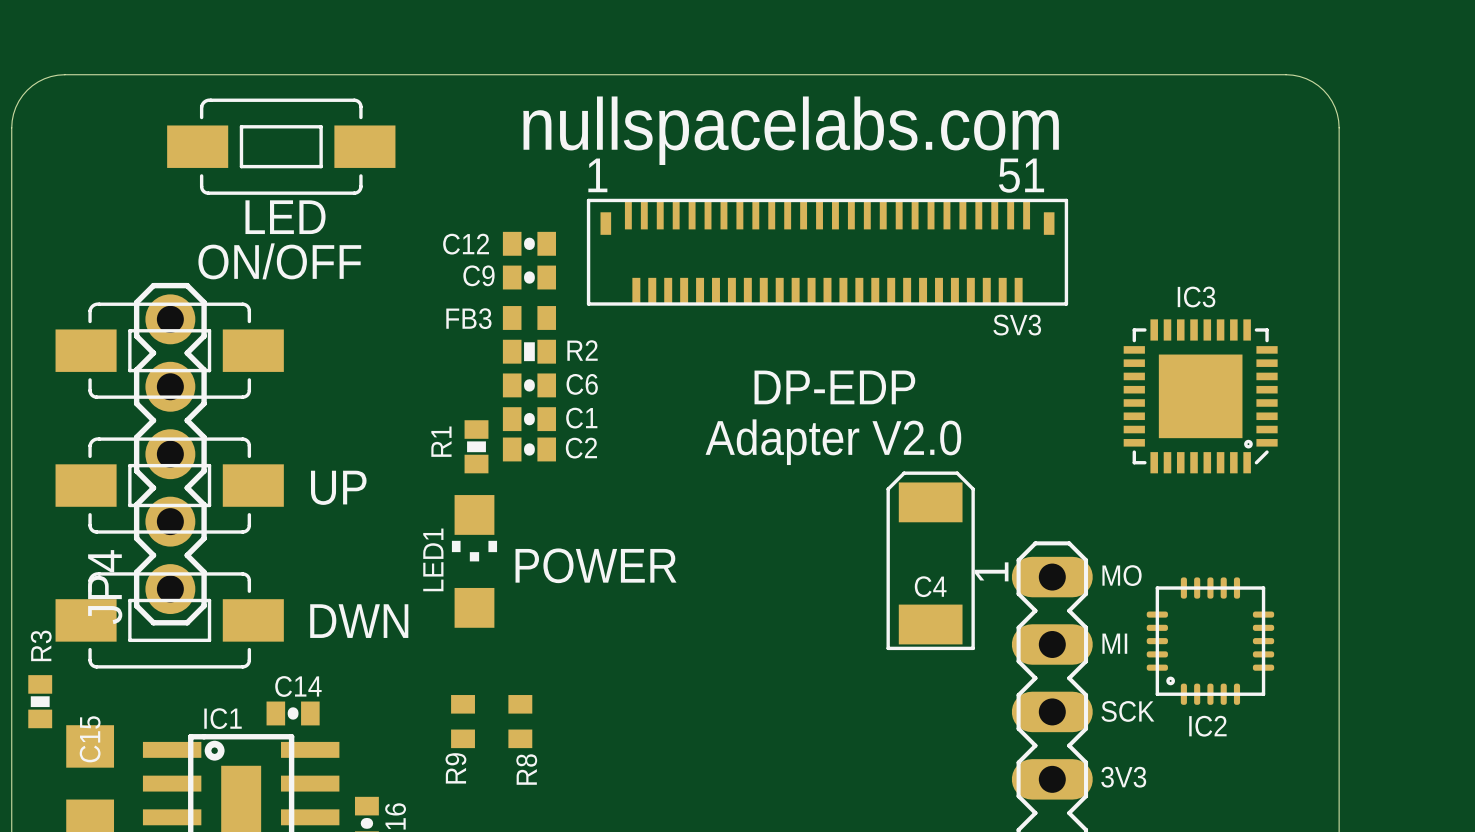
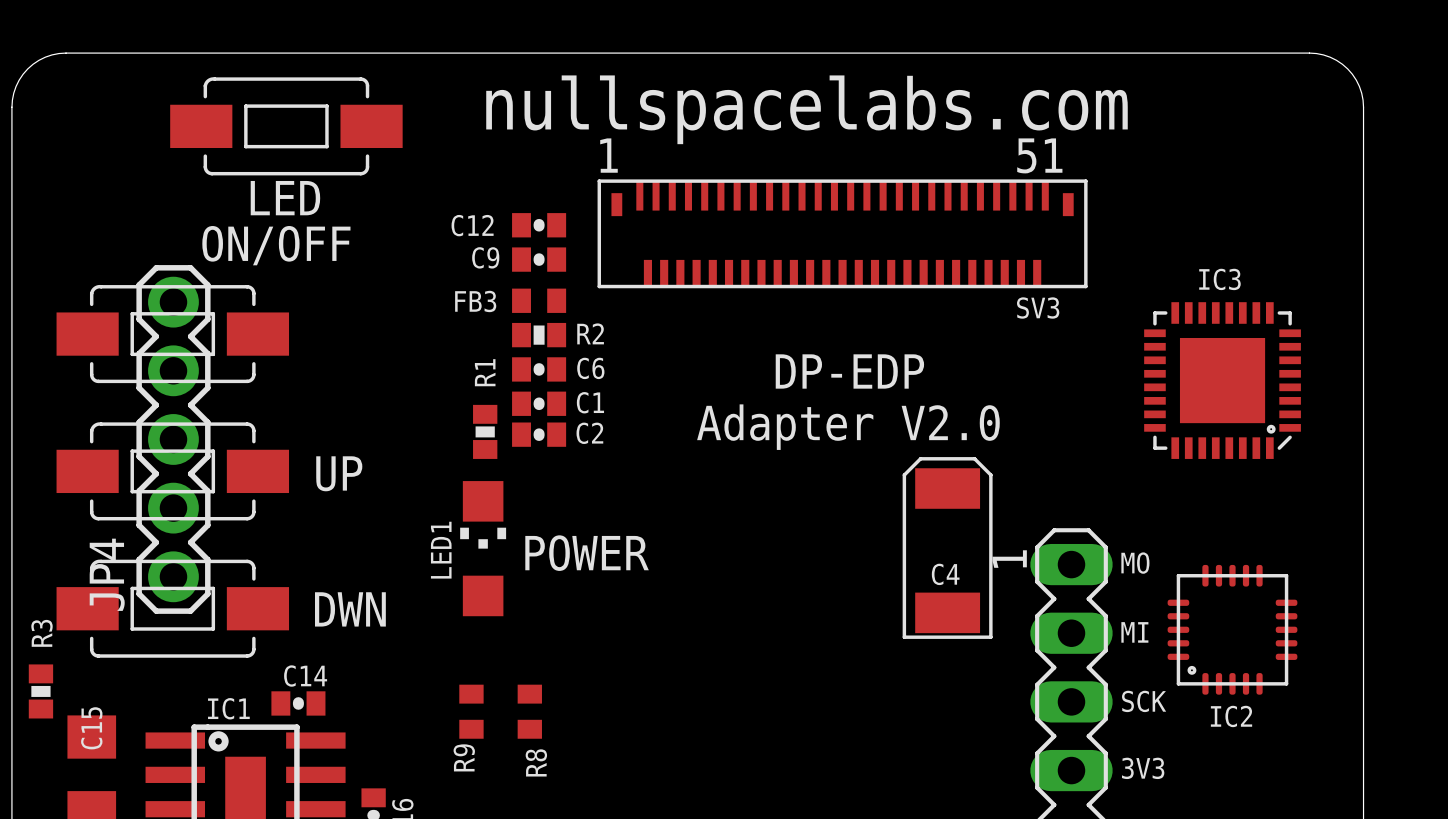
R1 name position: R1 (441, 441) -> R1 (485, 372)

